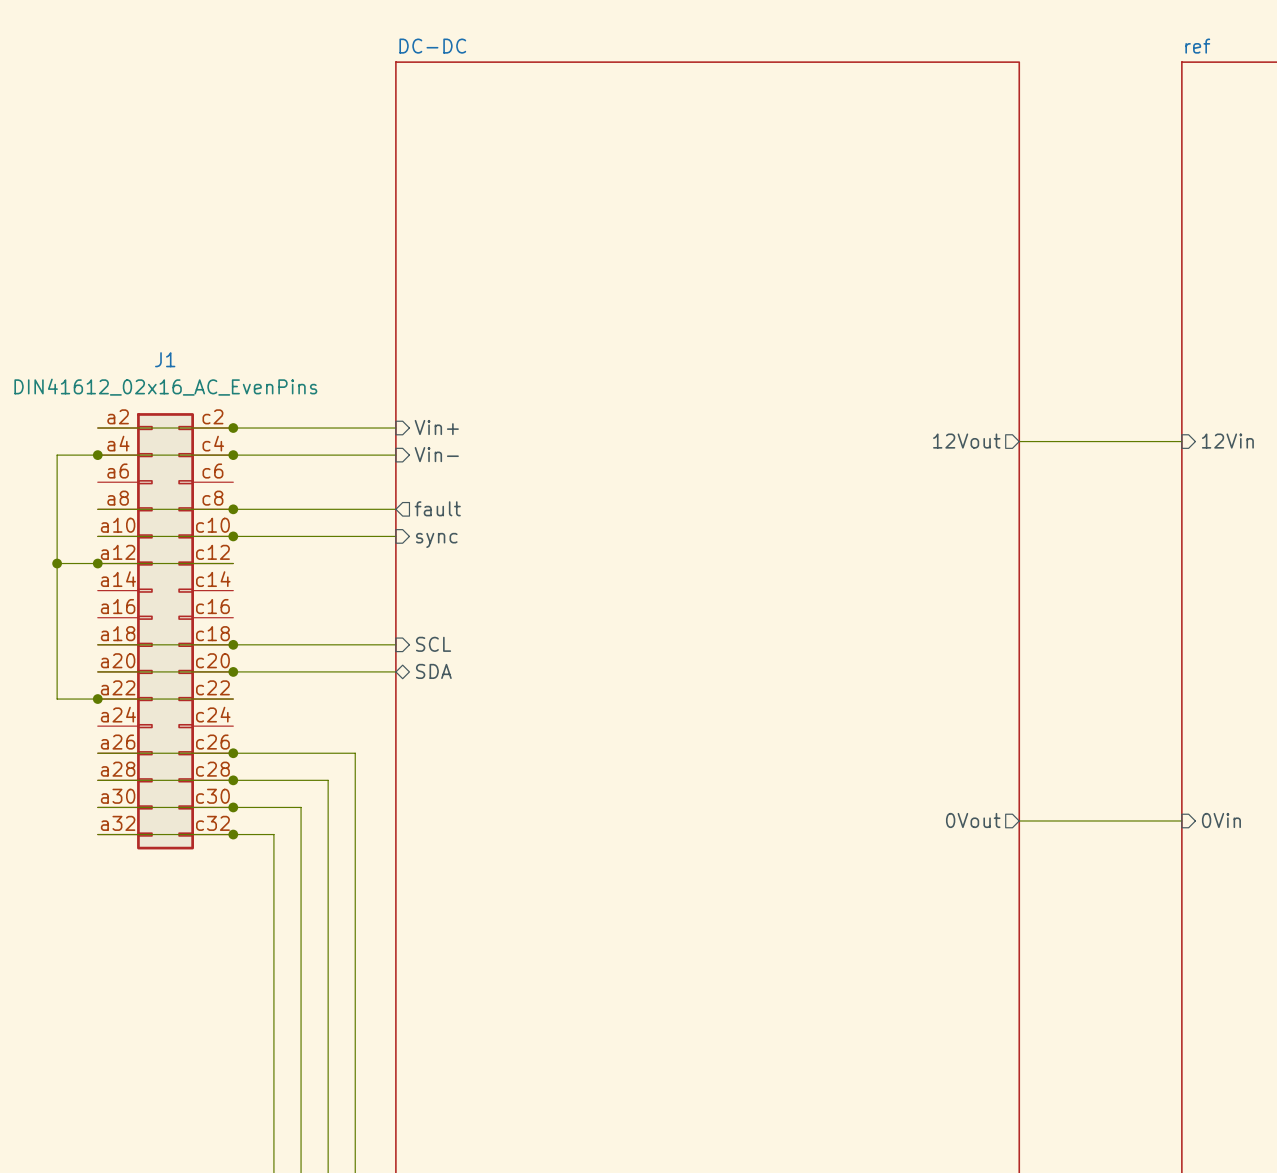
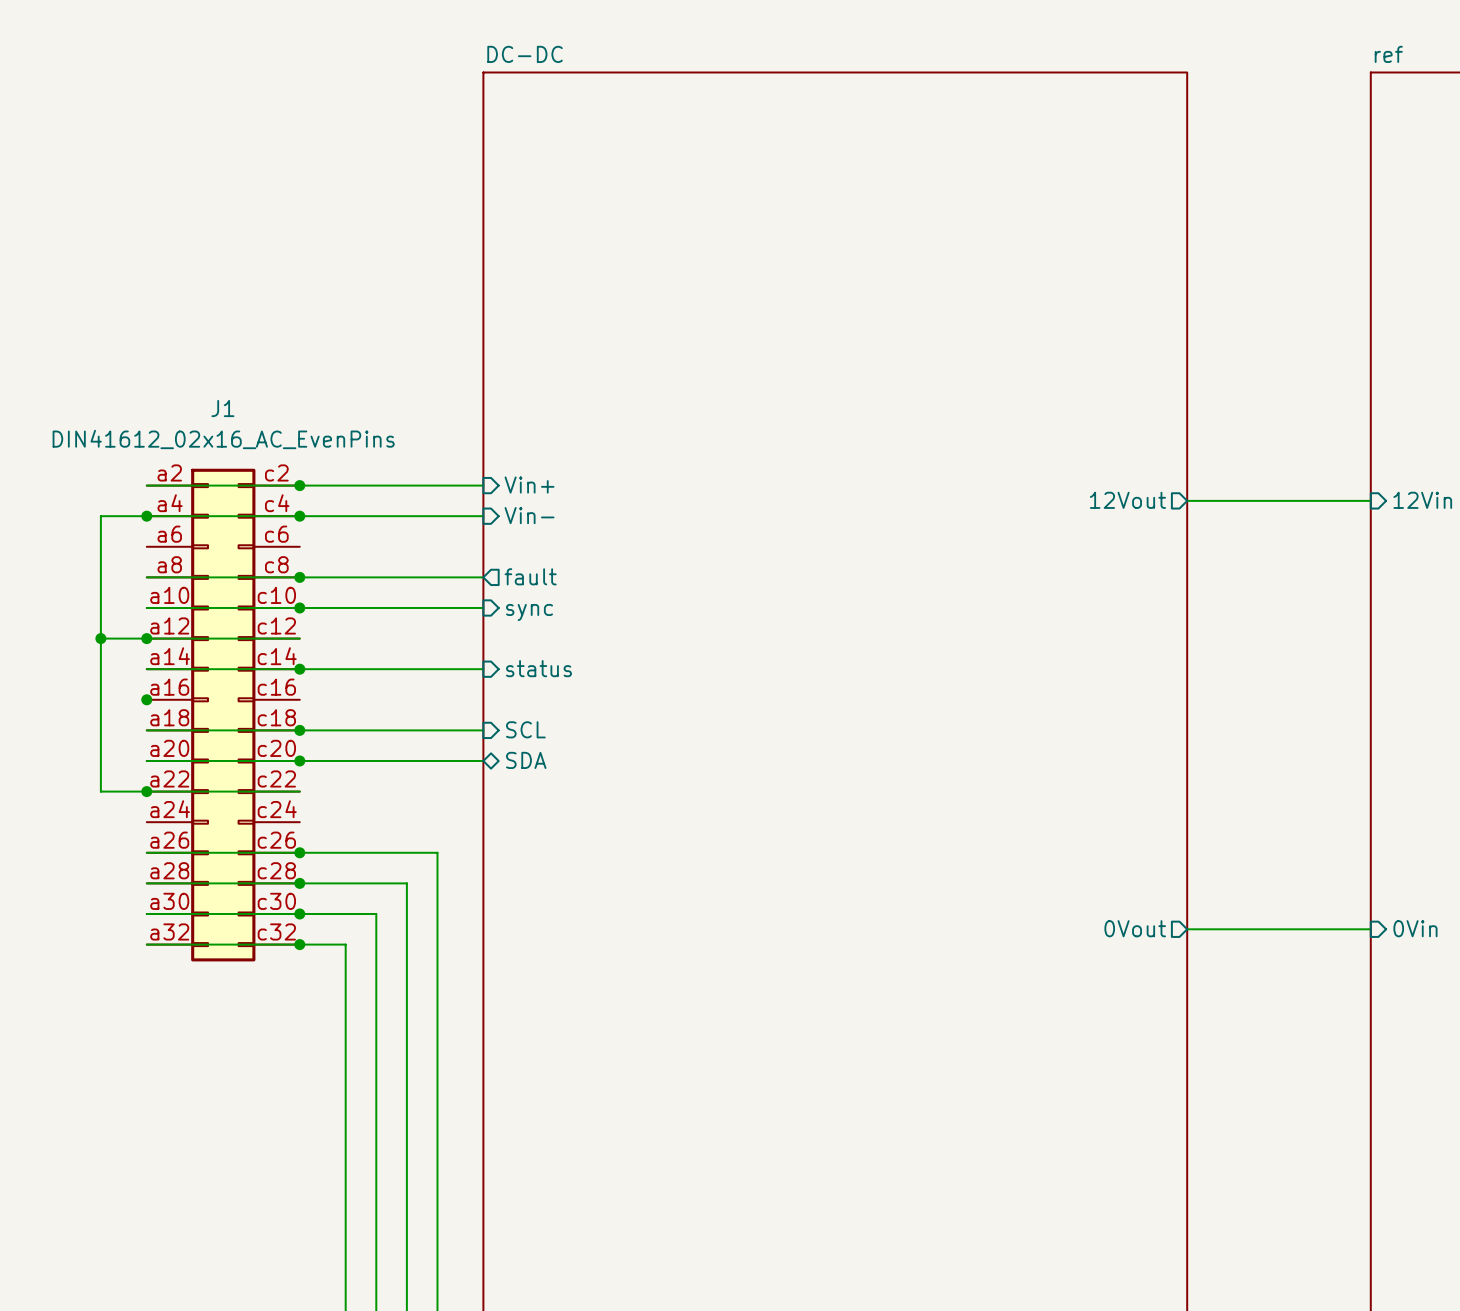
wire: none -> (146, 669) (483, 669)
junction: none -> (299, 669)
sheet pin: none -> status (539, 668)
junction: none -> (146, 699)

